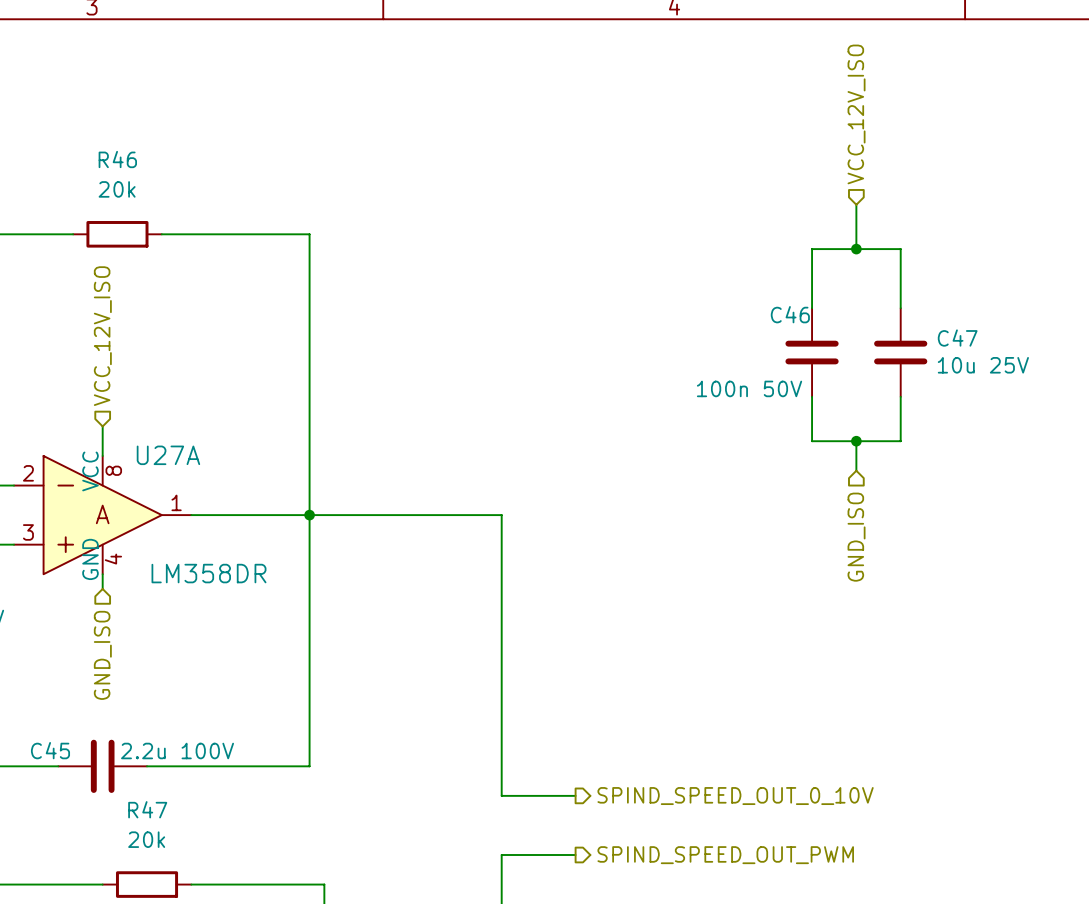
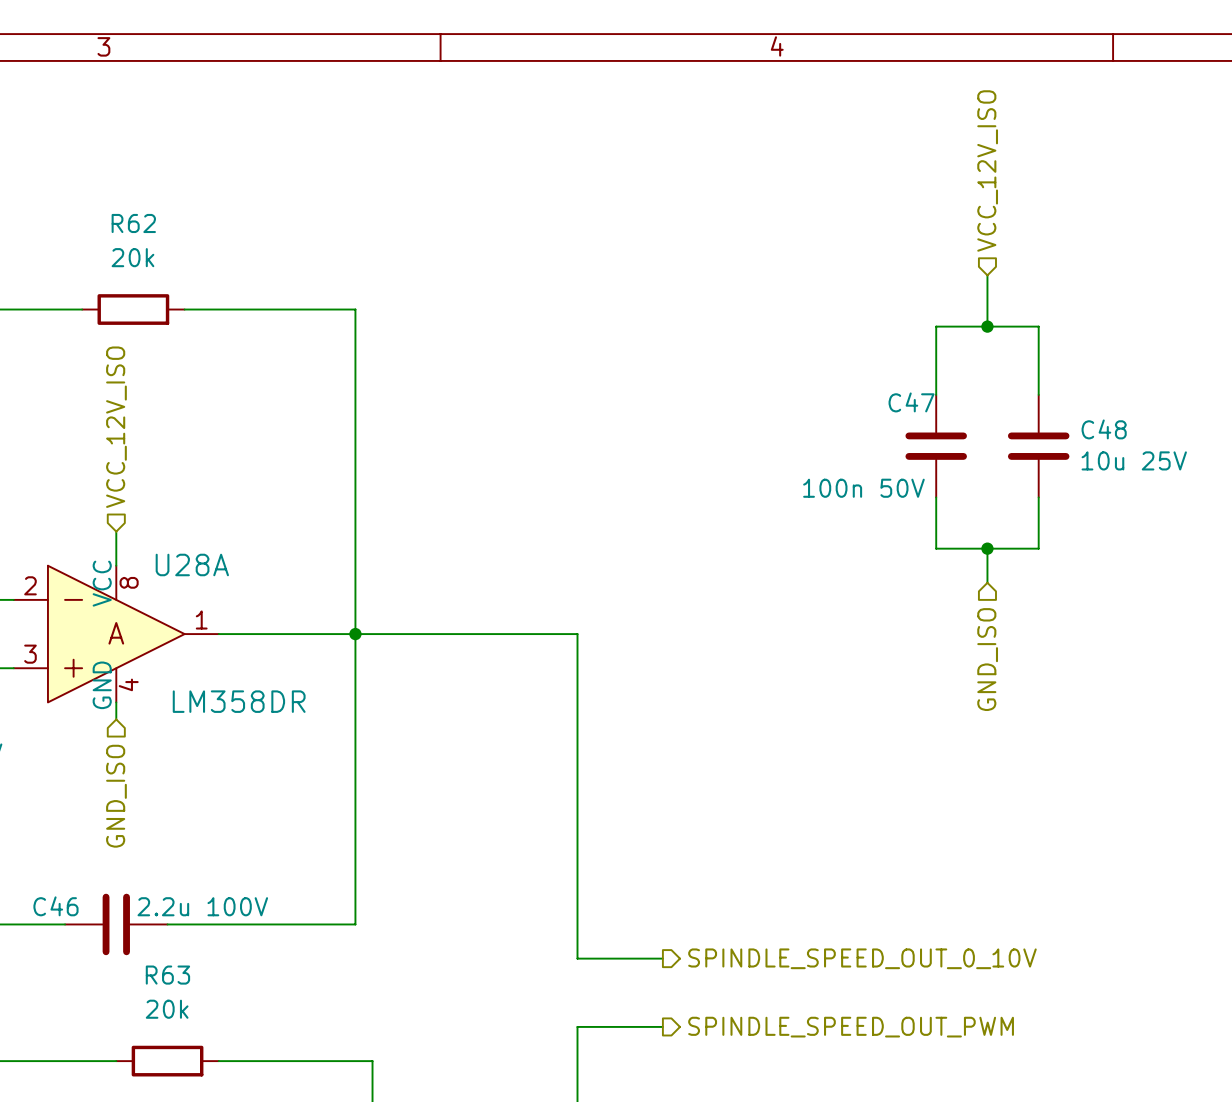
R46 name: R46 (117, 159) -> R62 (133, 223)
C46 name: C46 (790, 314) -> C47 (911, 402)
C47 name: C47 (957, 338) -> C48 (1104, 429)
U27A name: U27A (168, 455) -> U28A (192, 564)
C45 name: C45 (50, 750) -> C46 (55, 906)
hierarchical label: SPIND_SPEED_OUT_0_10V (735, 796) -> SPINDLE_SPEED_OUT_0_10V (862, 958)
R47 name: R47 (147, 809) -> R63 (167, 975)
hierarchical label: SPIND_SPEED_OUT_PWM (725, 855) -> SPINDLE_SPEED_OUT_PWM (851, 1027)

